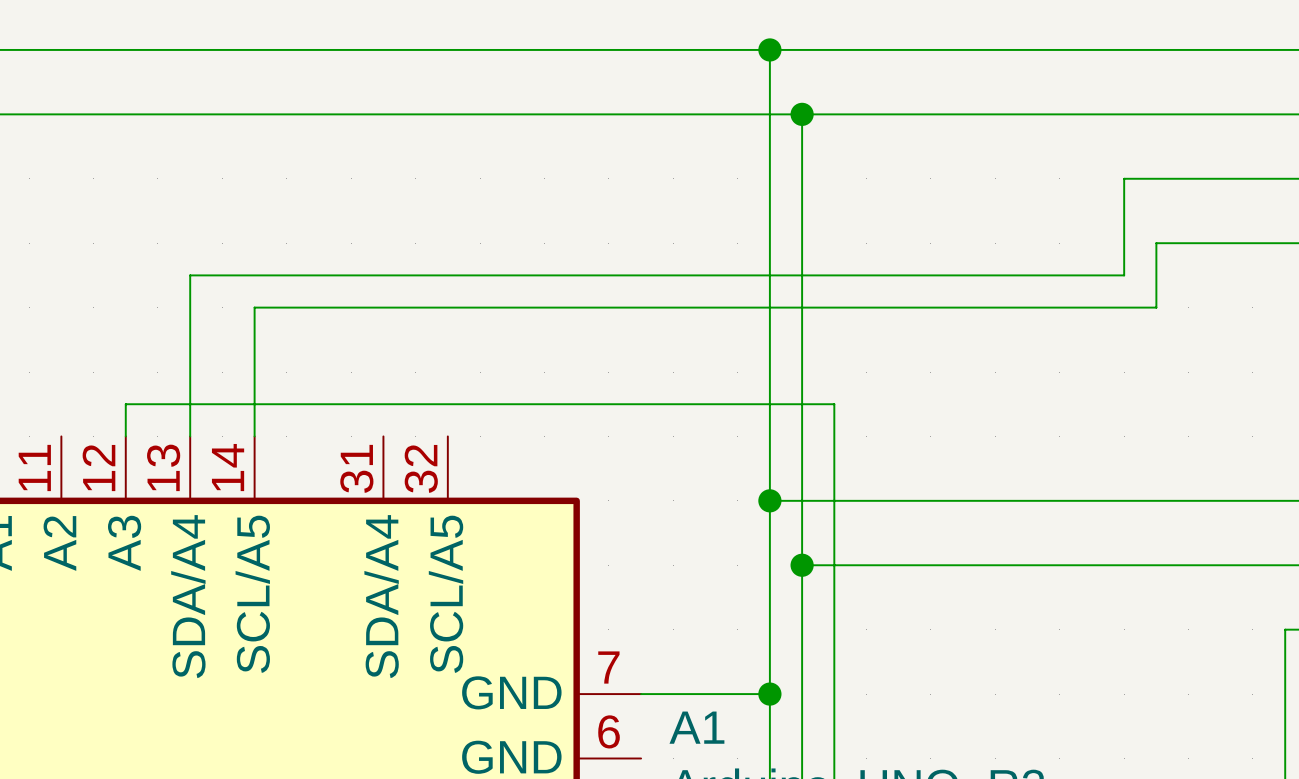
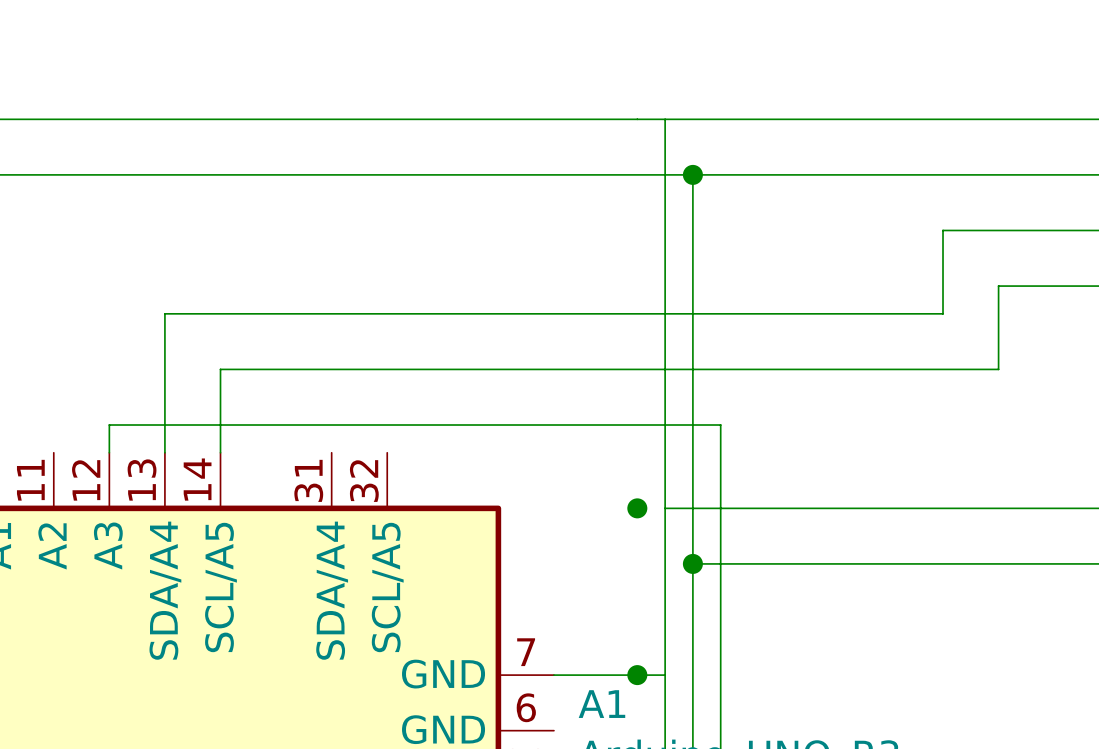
junction: (769, 49) -> none
wire: (1124, 178) (1124, 275) (1091, 275) -> (970, 230) (943, 230) (943, 313)
wire: (1156, 307) (254, 307) (254, 339) -> (998, 341) (998, 369) (220, 369)
junction position: (769, 500) -> (637, 508)
junction position: (769, 694) -> (637, 675)

